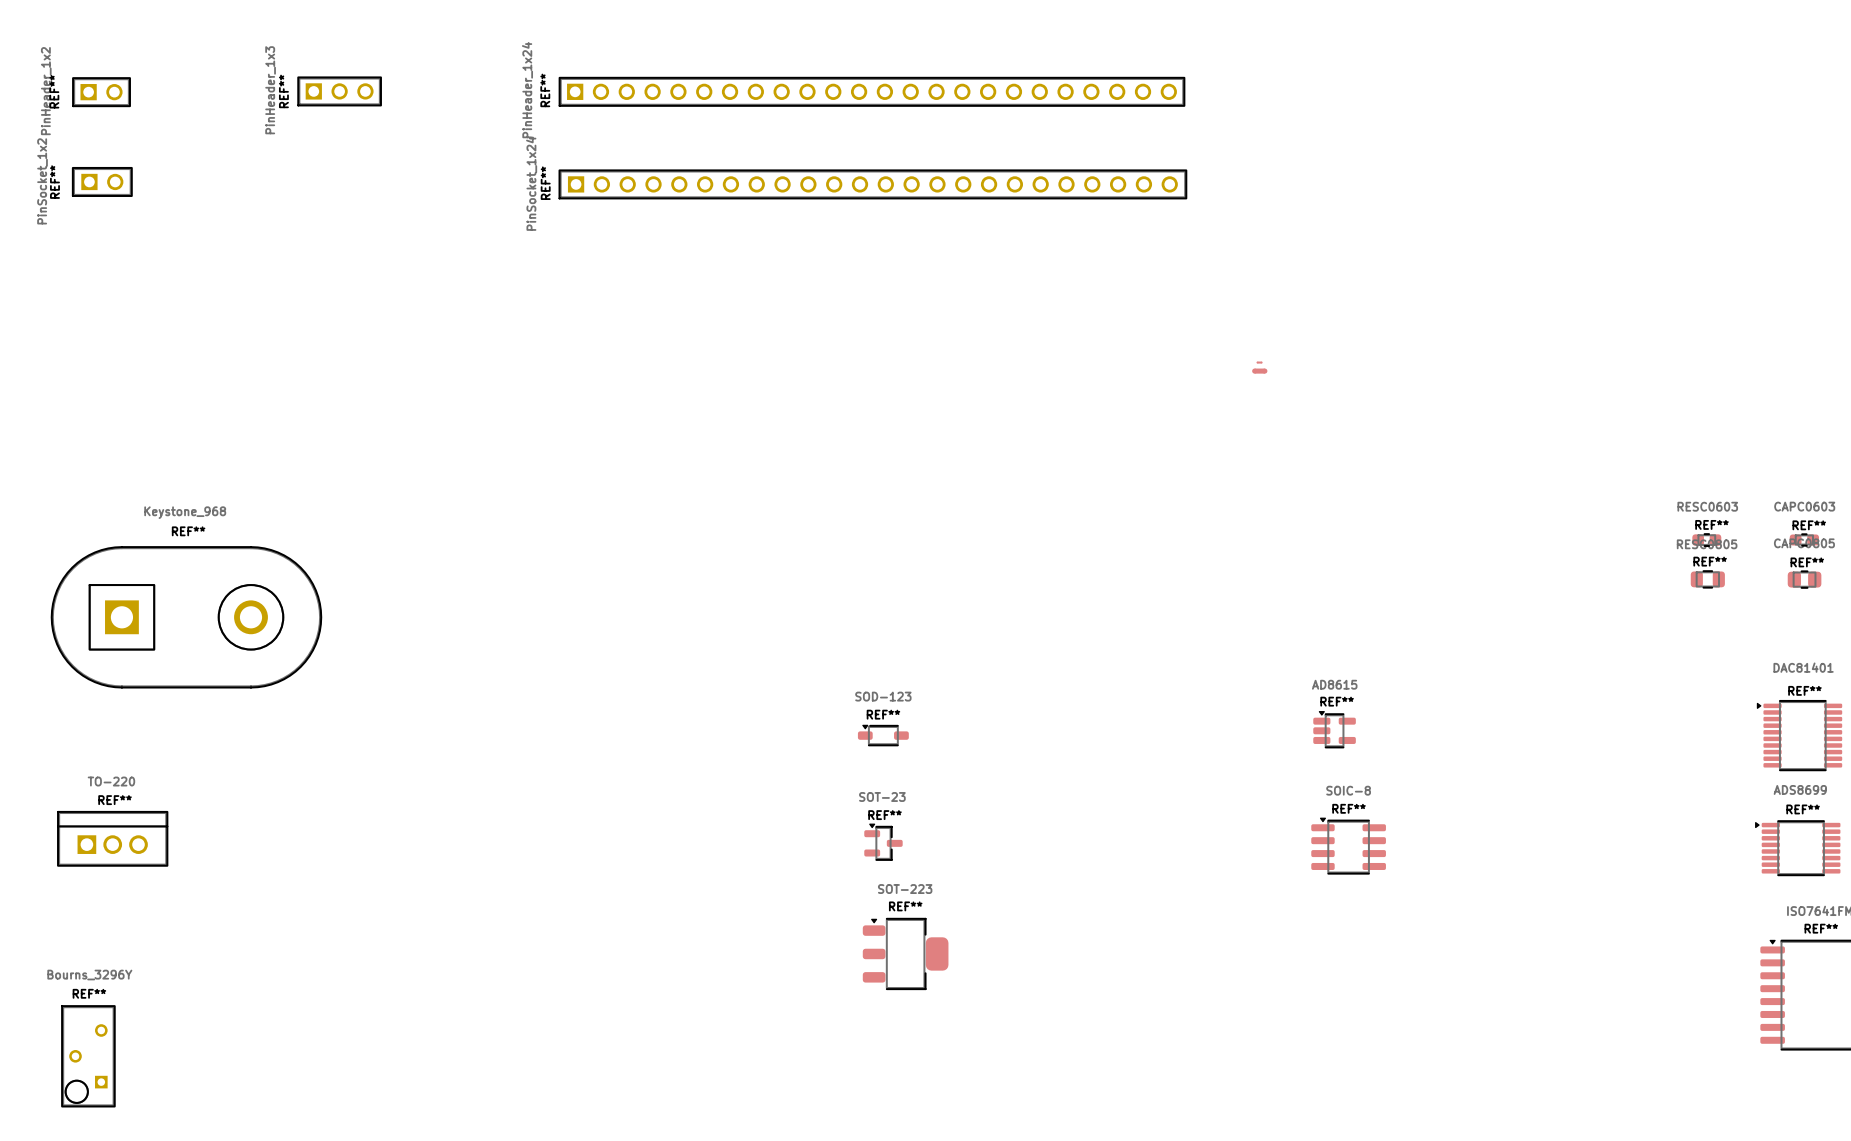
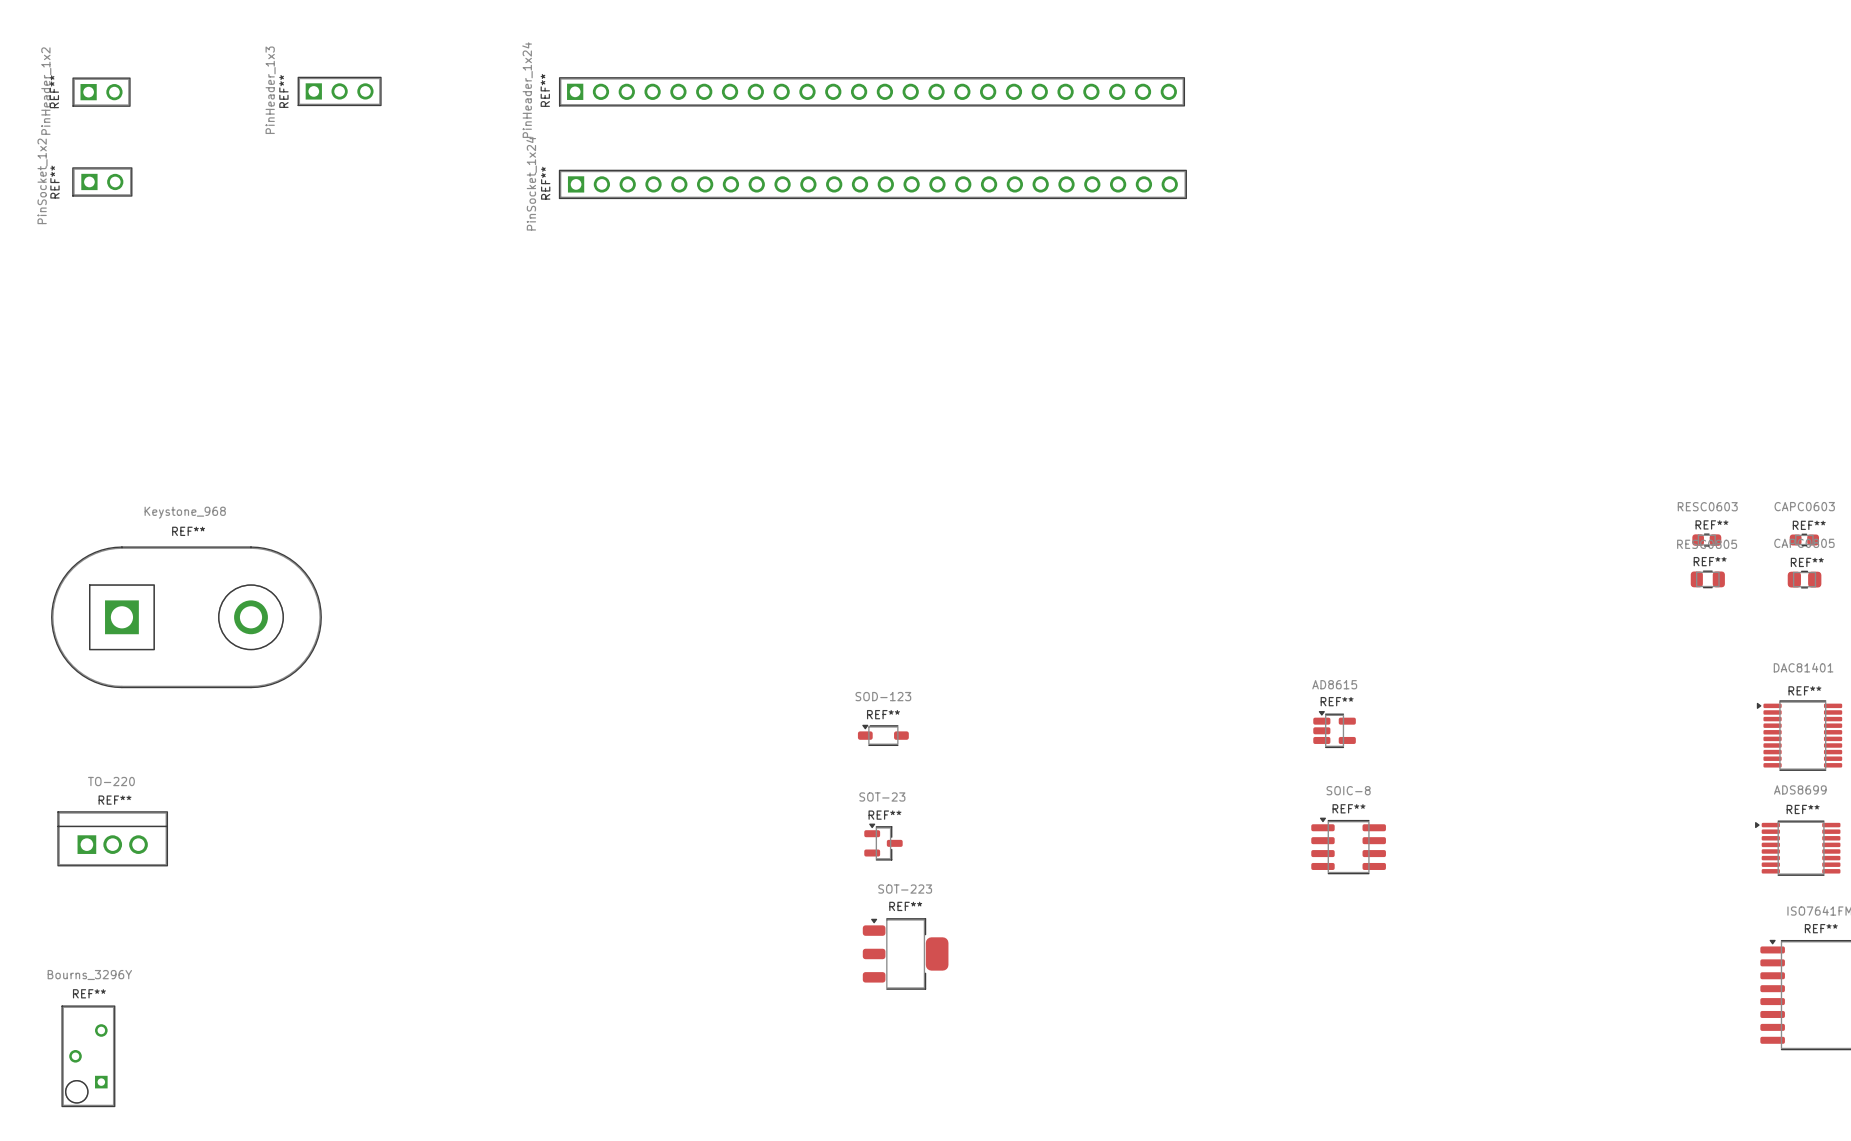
part: (1259, 362) -> none
part: (1259, 371) -> none

